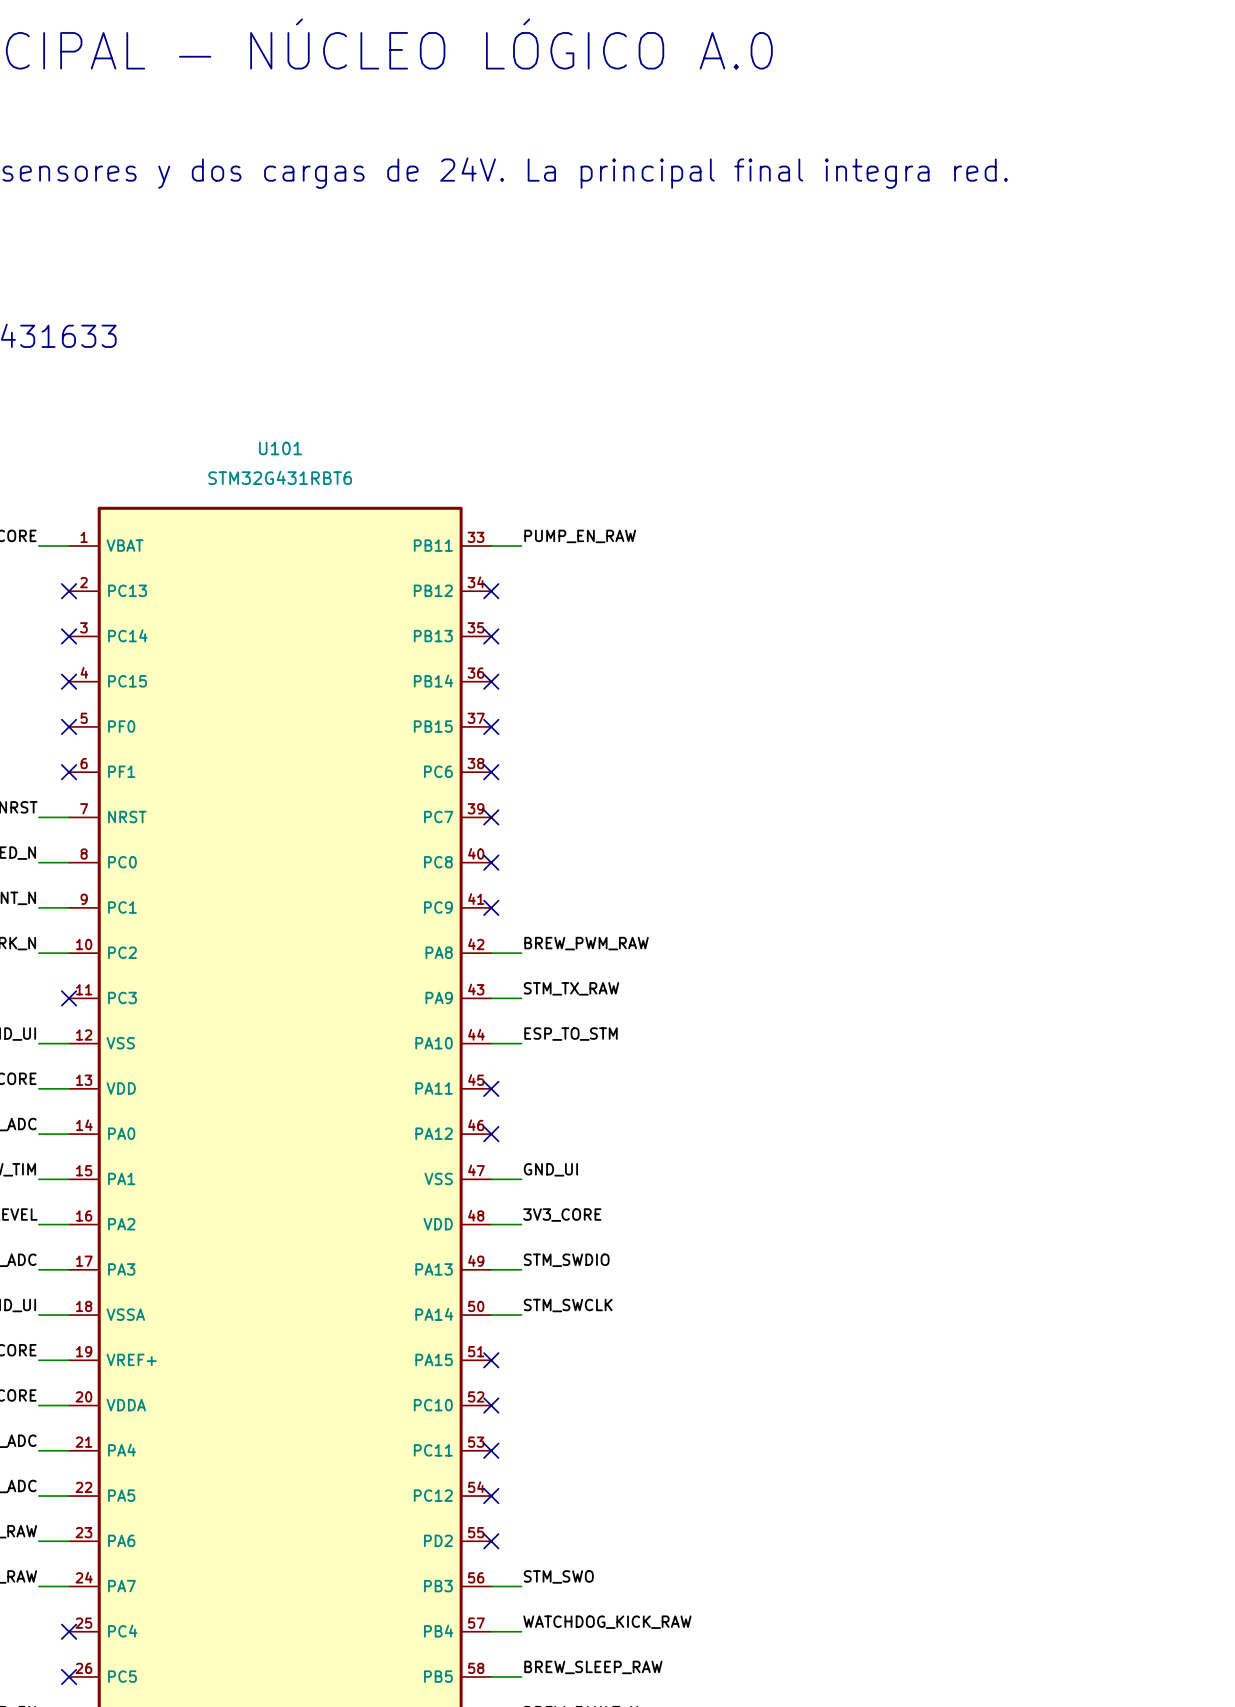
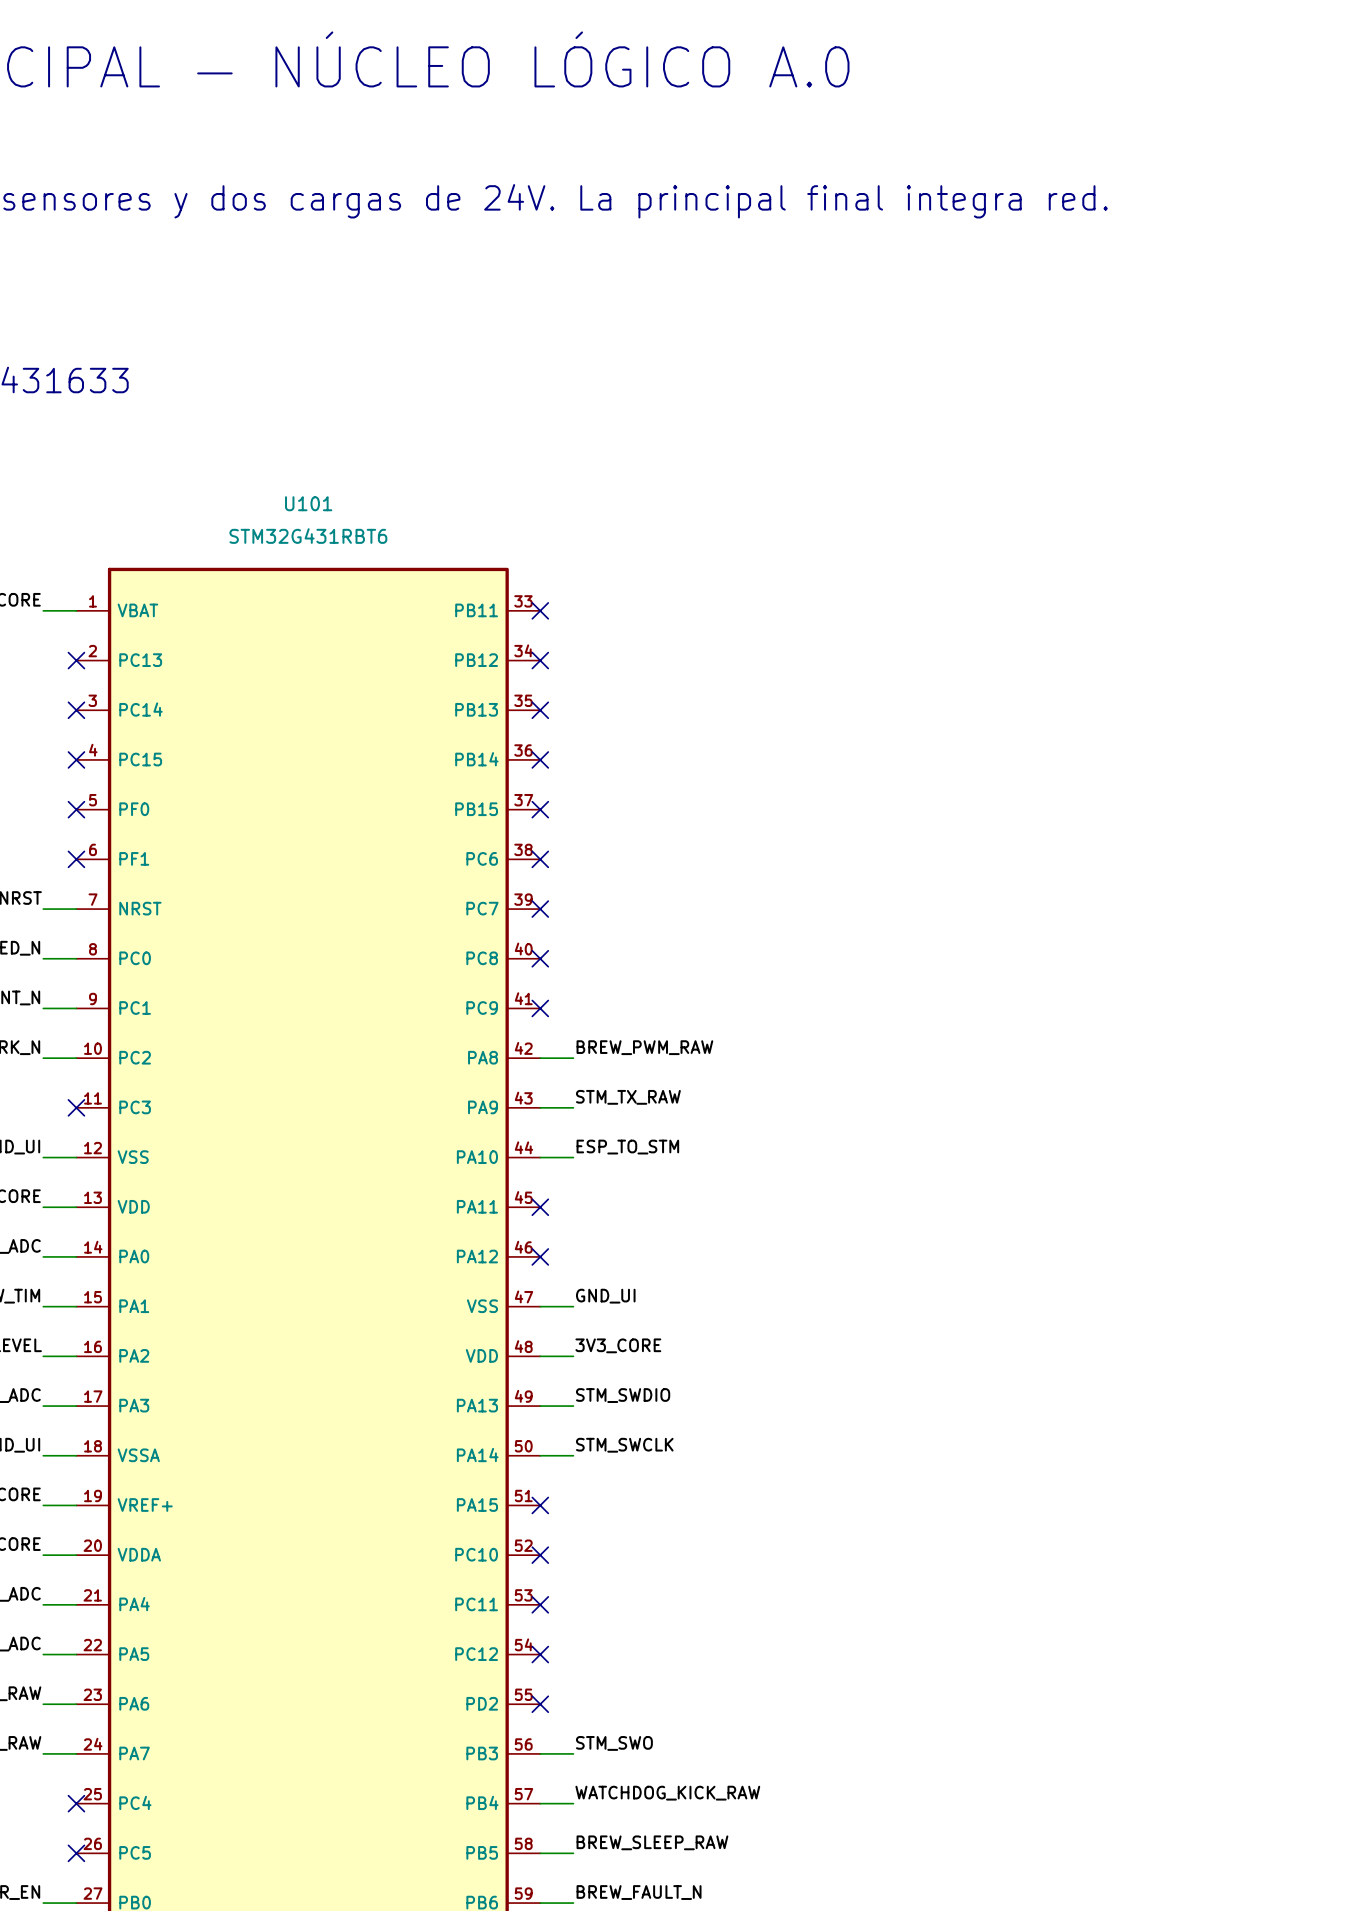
label: PUMP_EN_RAW (580, 536) -> none
wire: (491, 545) (521, 545) -> none
no-connect mark: none -> (540, 610)

